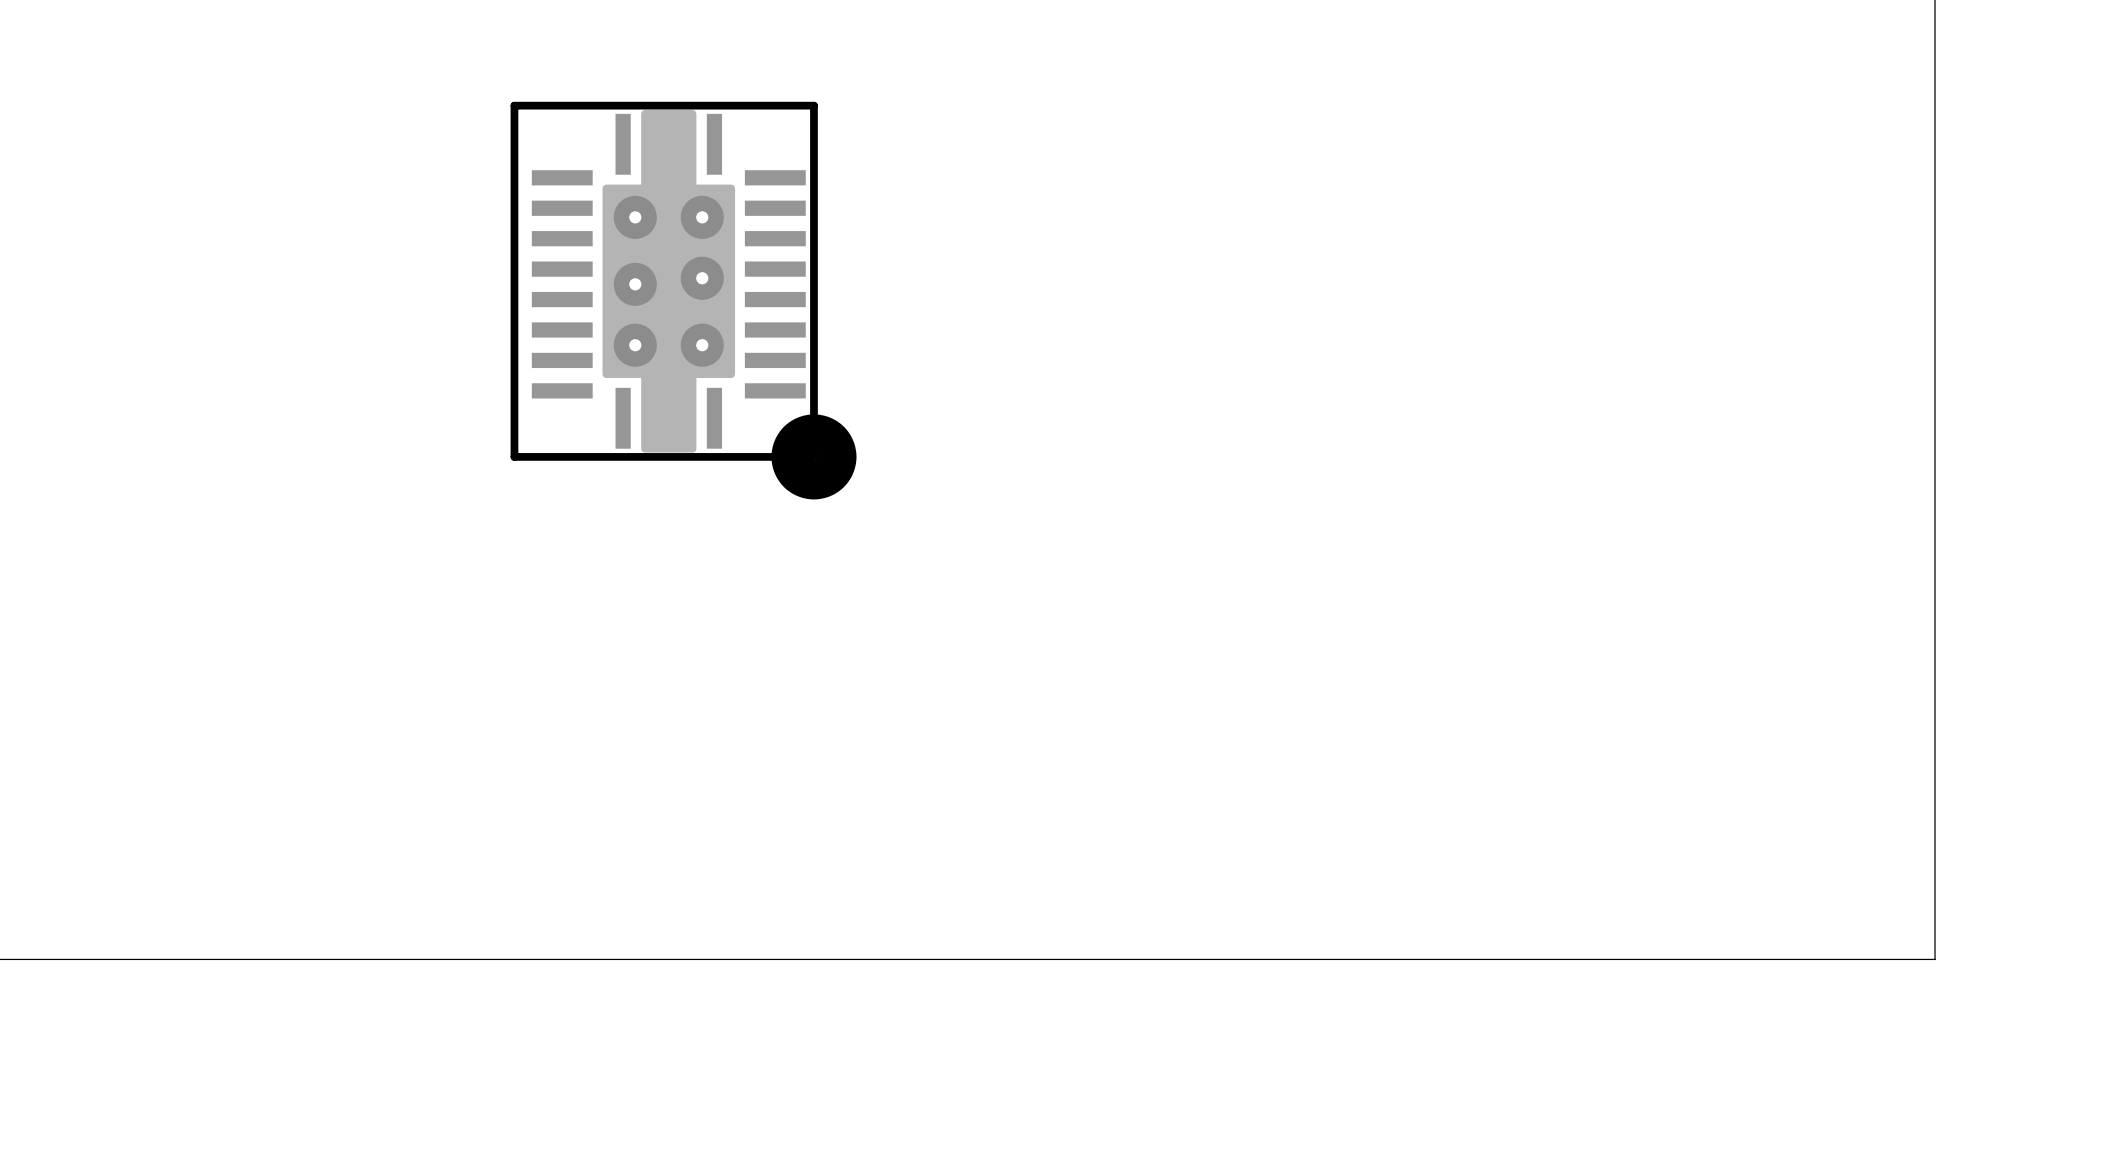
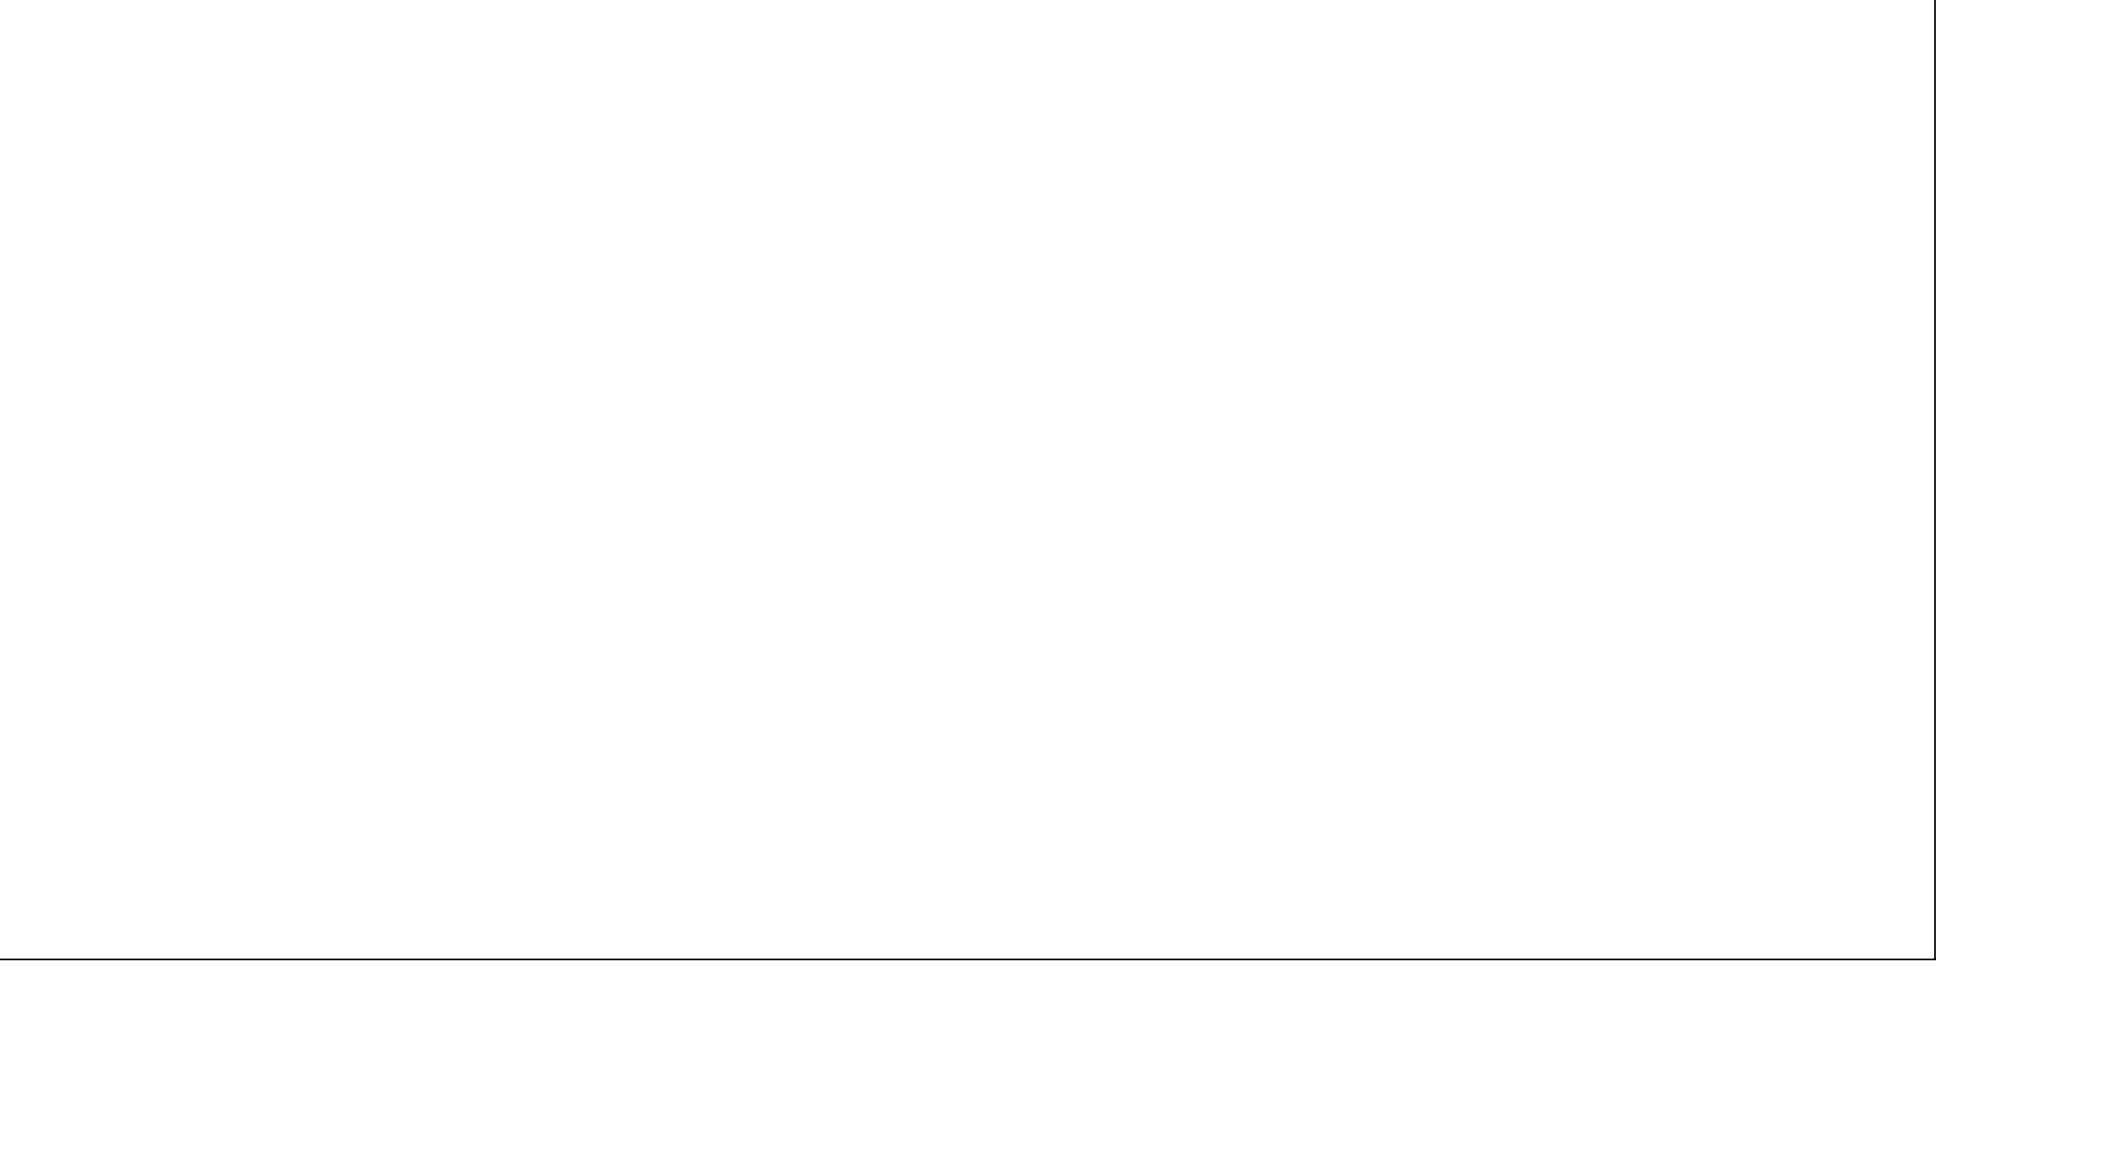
part: (683, 300) -> none

